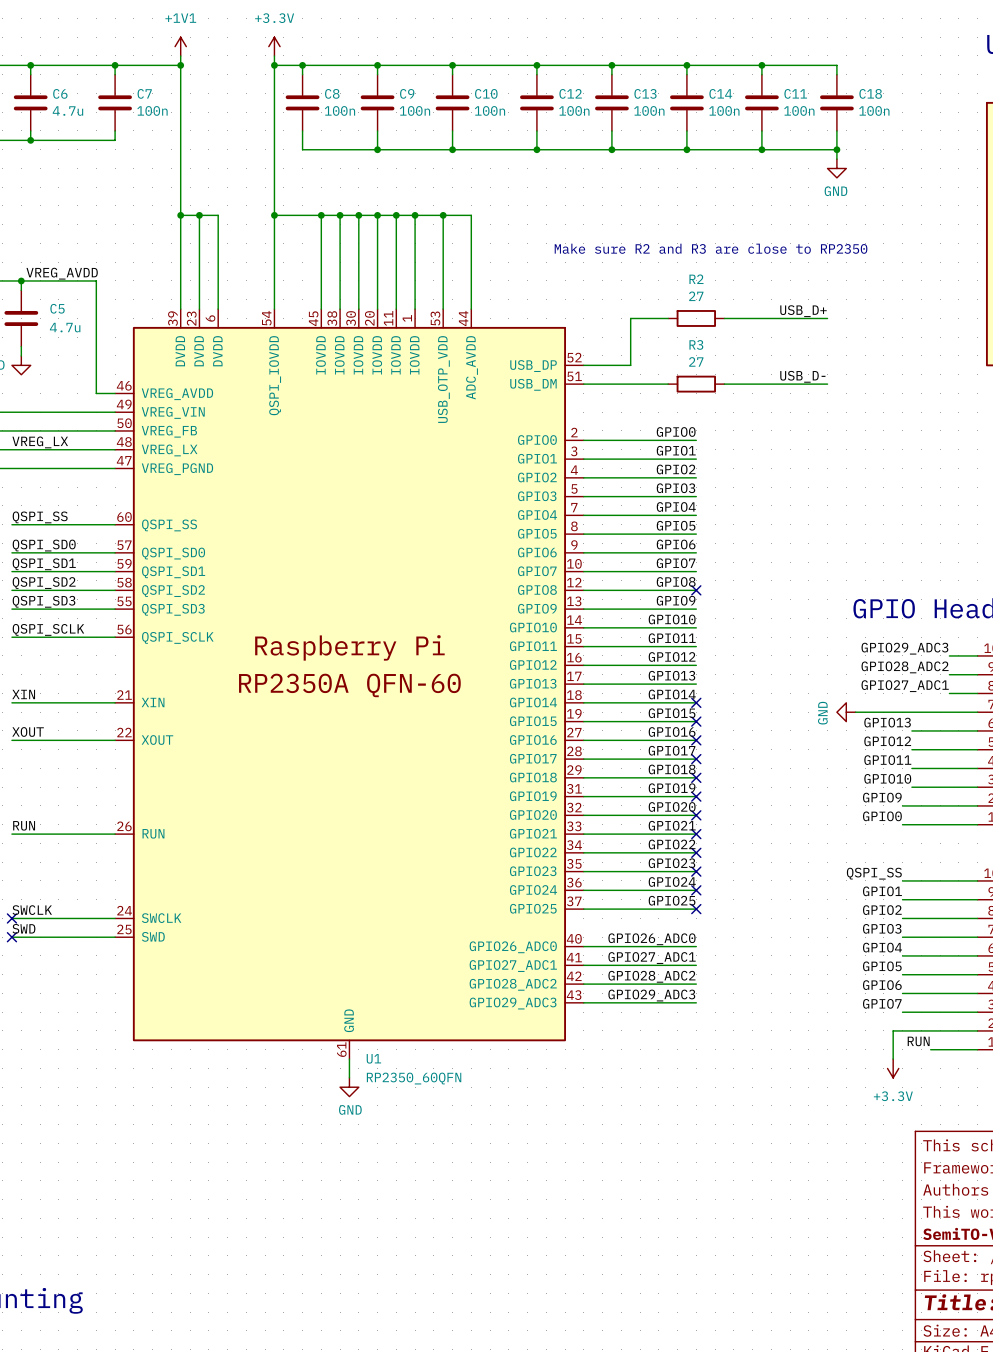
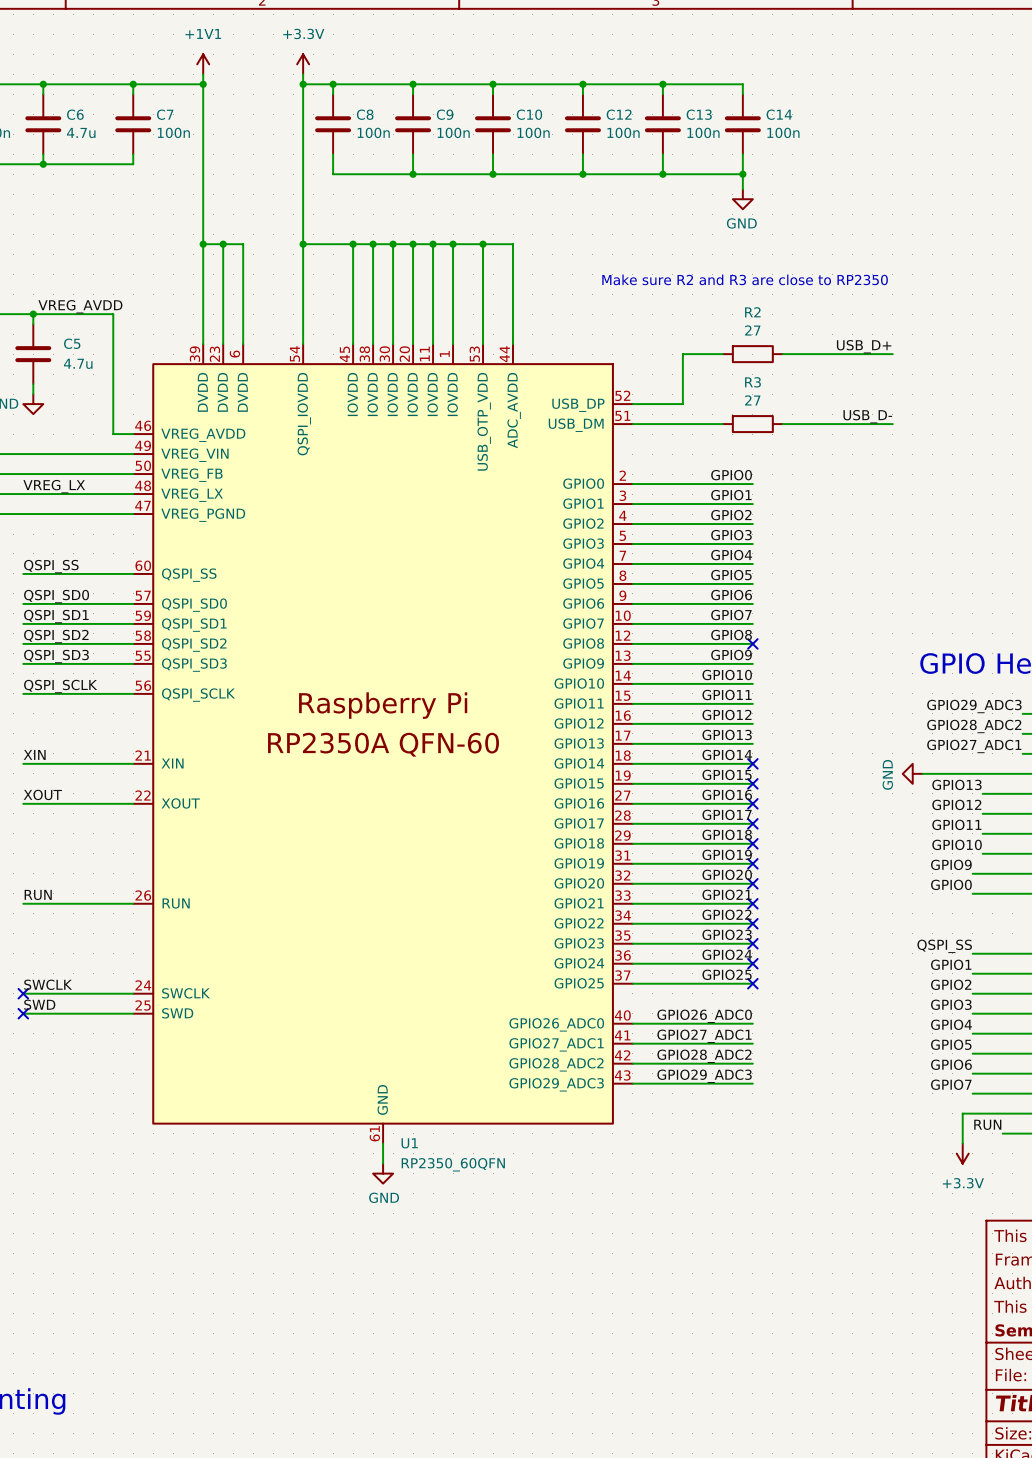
wire: (686, 65) (836, 65) (836, 74) -> none
junction: (686, 65) -> none
wire: (761, 65) (761, 74) -> none
junction: (761, 65) -> none
C11: 100n (761, 102) -> none
C18: 100n (836, 102) -> none
wire: (761, 130) (761, 149) -> none
wire: (836, 130) (836, 159) -> none
wire: (686, 149) (836, 149) -> (742, 174) (742, 189)
junction: (761, 149) -> none
junction: (836, 149) -> none
power symbol position: GND (836, 168) -> GND (742, 199)

